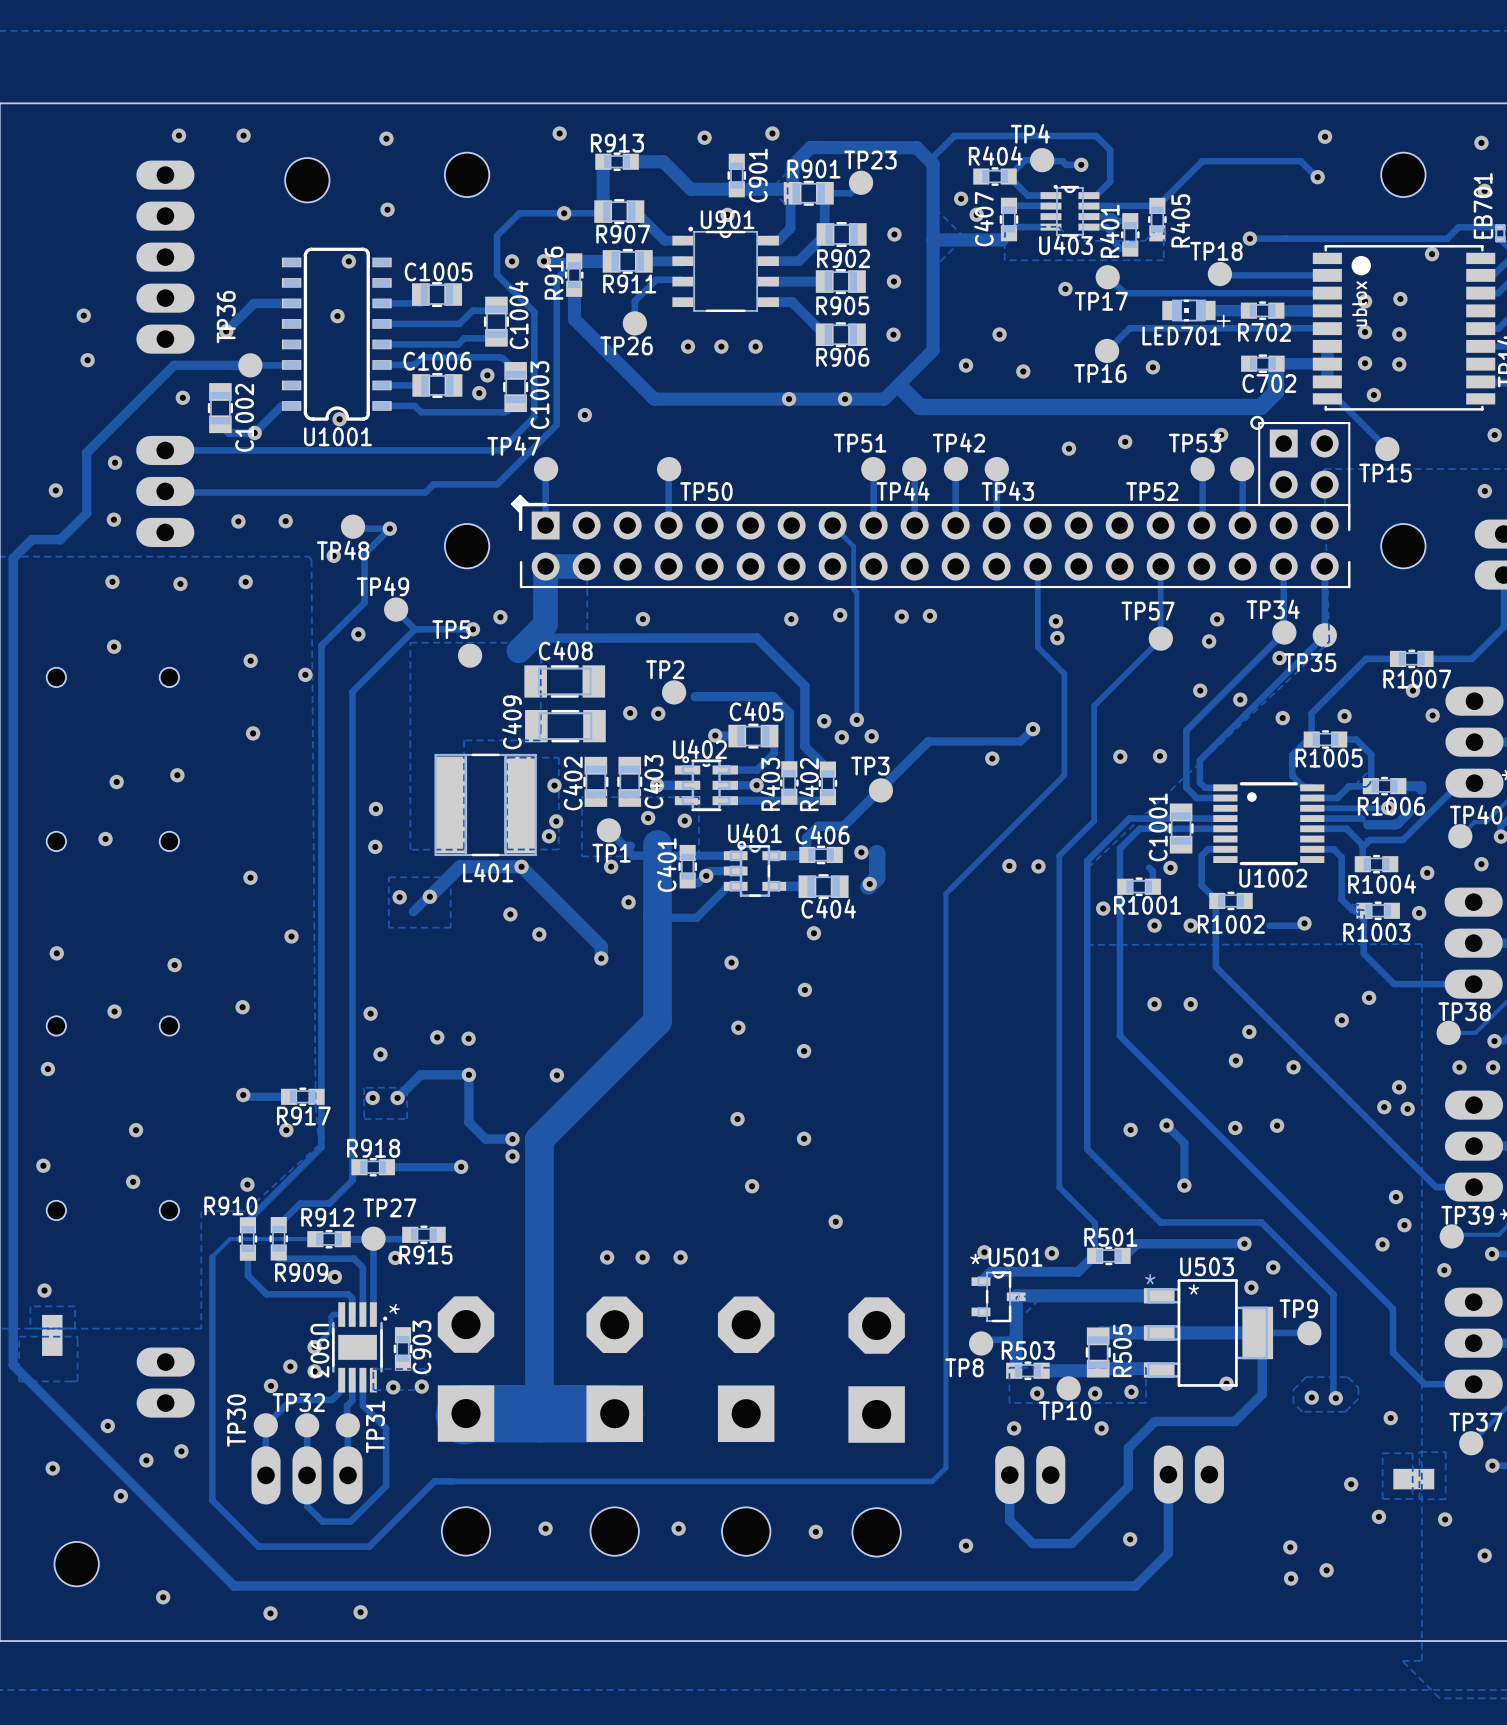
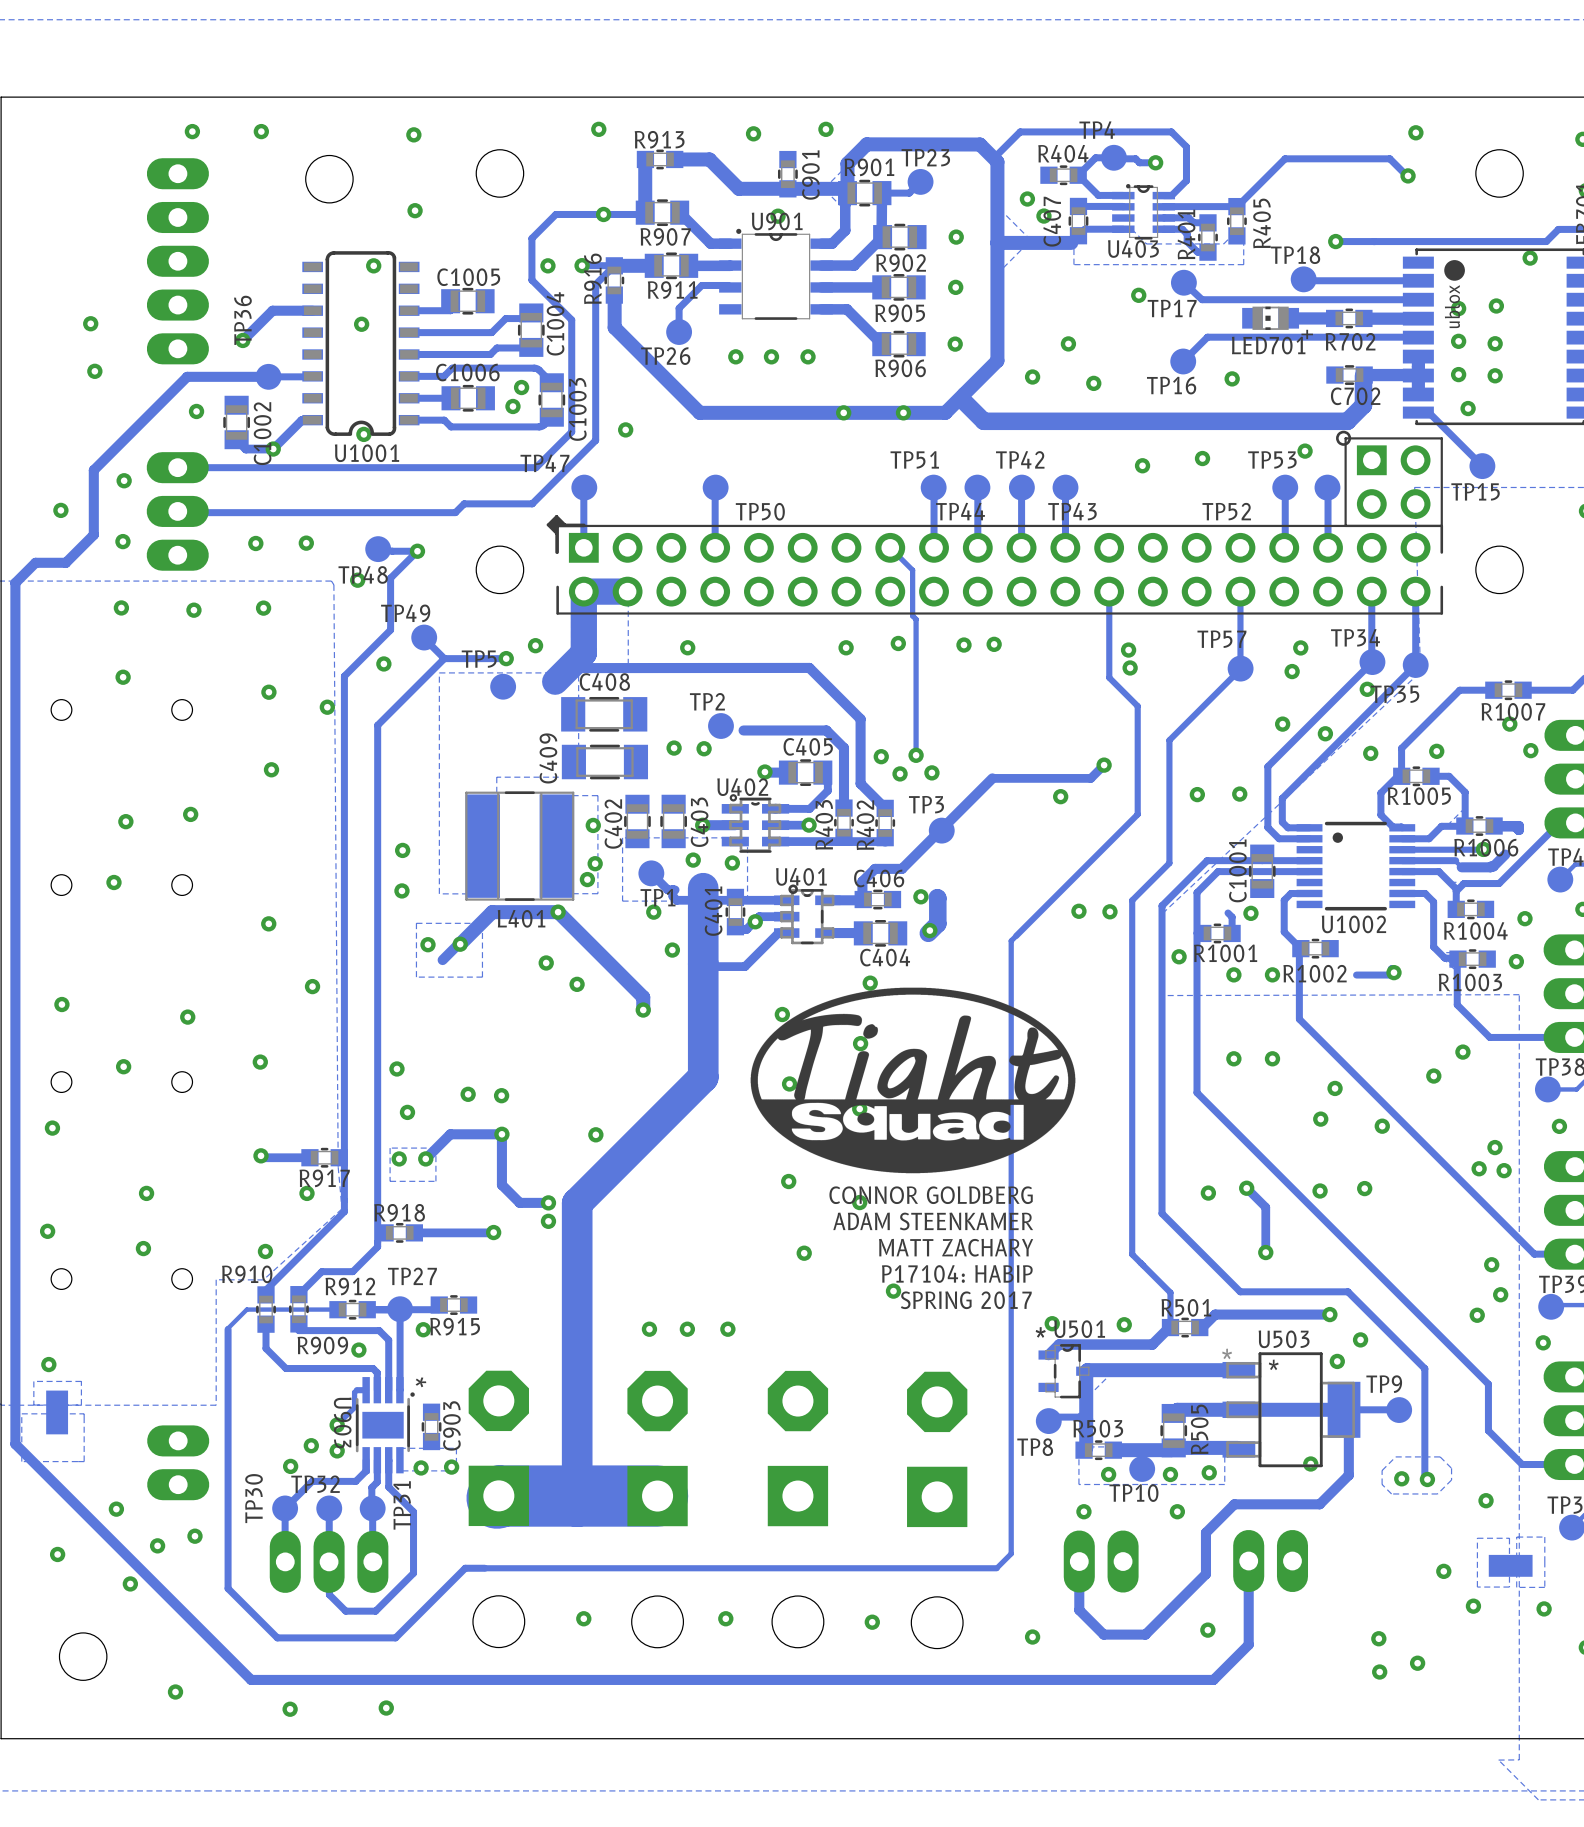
drawing: none -> [750, 987, 1076, 1174]
text: none -> CONNOR GOLDBERG (931, 1195)
text: none -> ADAM STEENKAMER (933, 1221)
text: none -> MATT ZACHARY (956, 1247)
text: none -> P17104: HABIP (957, 1273)
text: none -> SPRING 2017 (966, 1300)

